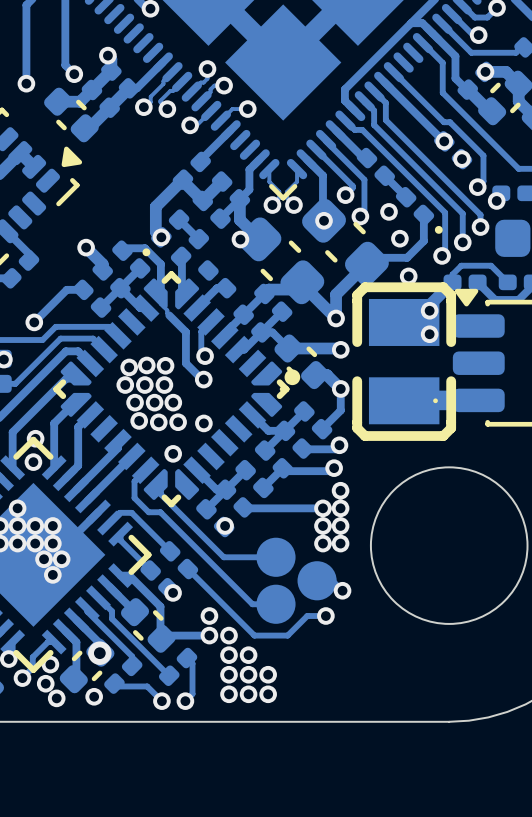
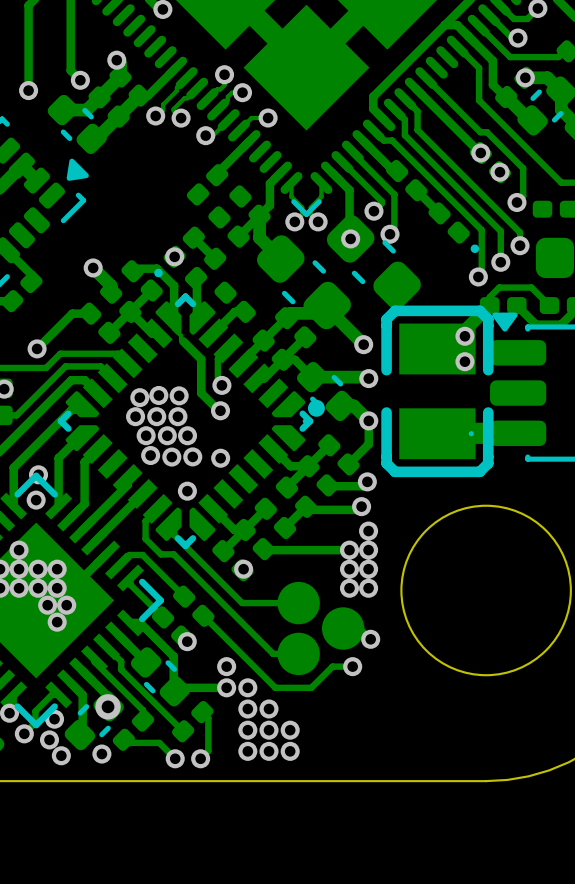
track: (222, 181) (202, 200) (182, 179) (155, 206) (155, 231) (161, 237) -> none
via: (496, 200) -> none
via: (389, 211) -> none
track: (423, 214) (423, 241) (407, 257) (372, 257) (336, 294) (336, 318) -> none
via: (399, 238) -> none
via: (240, 239) -> none
via: (408, 276) -> none

